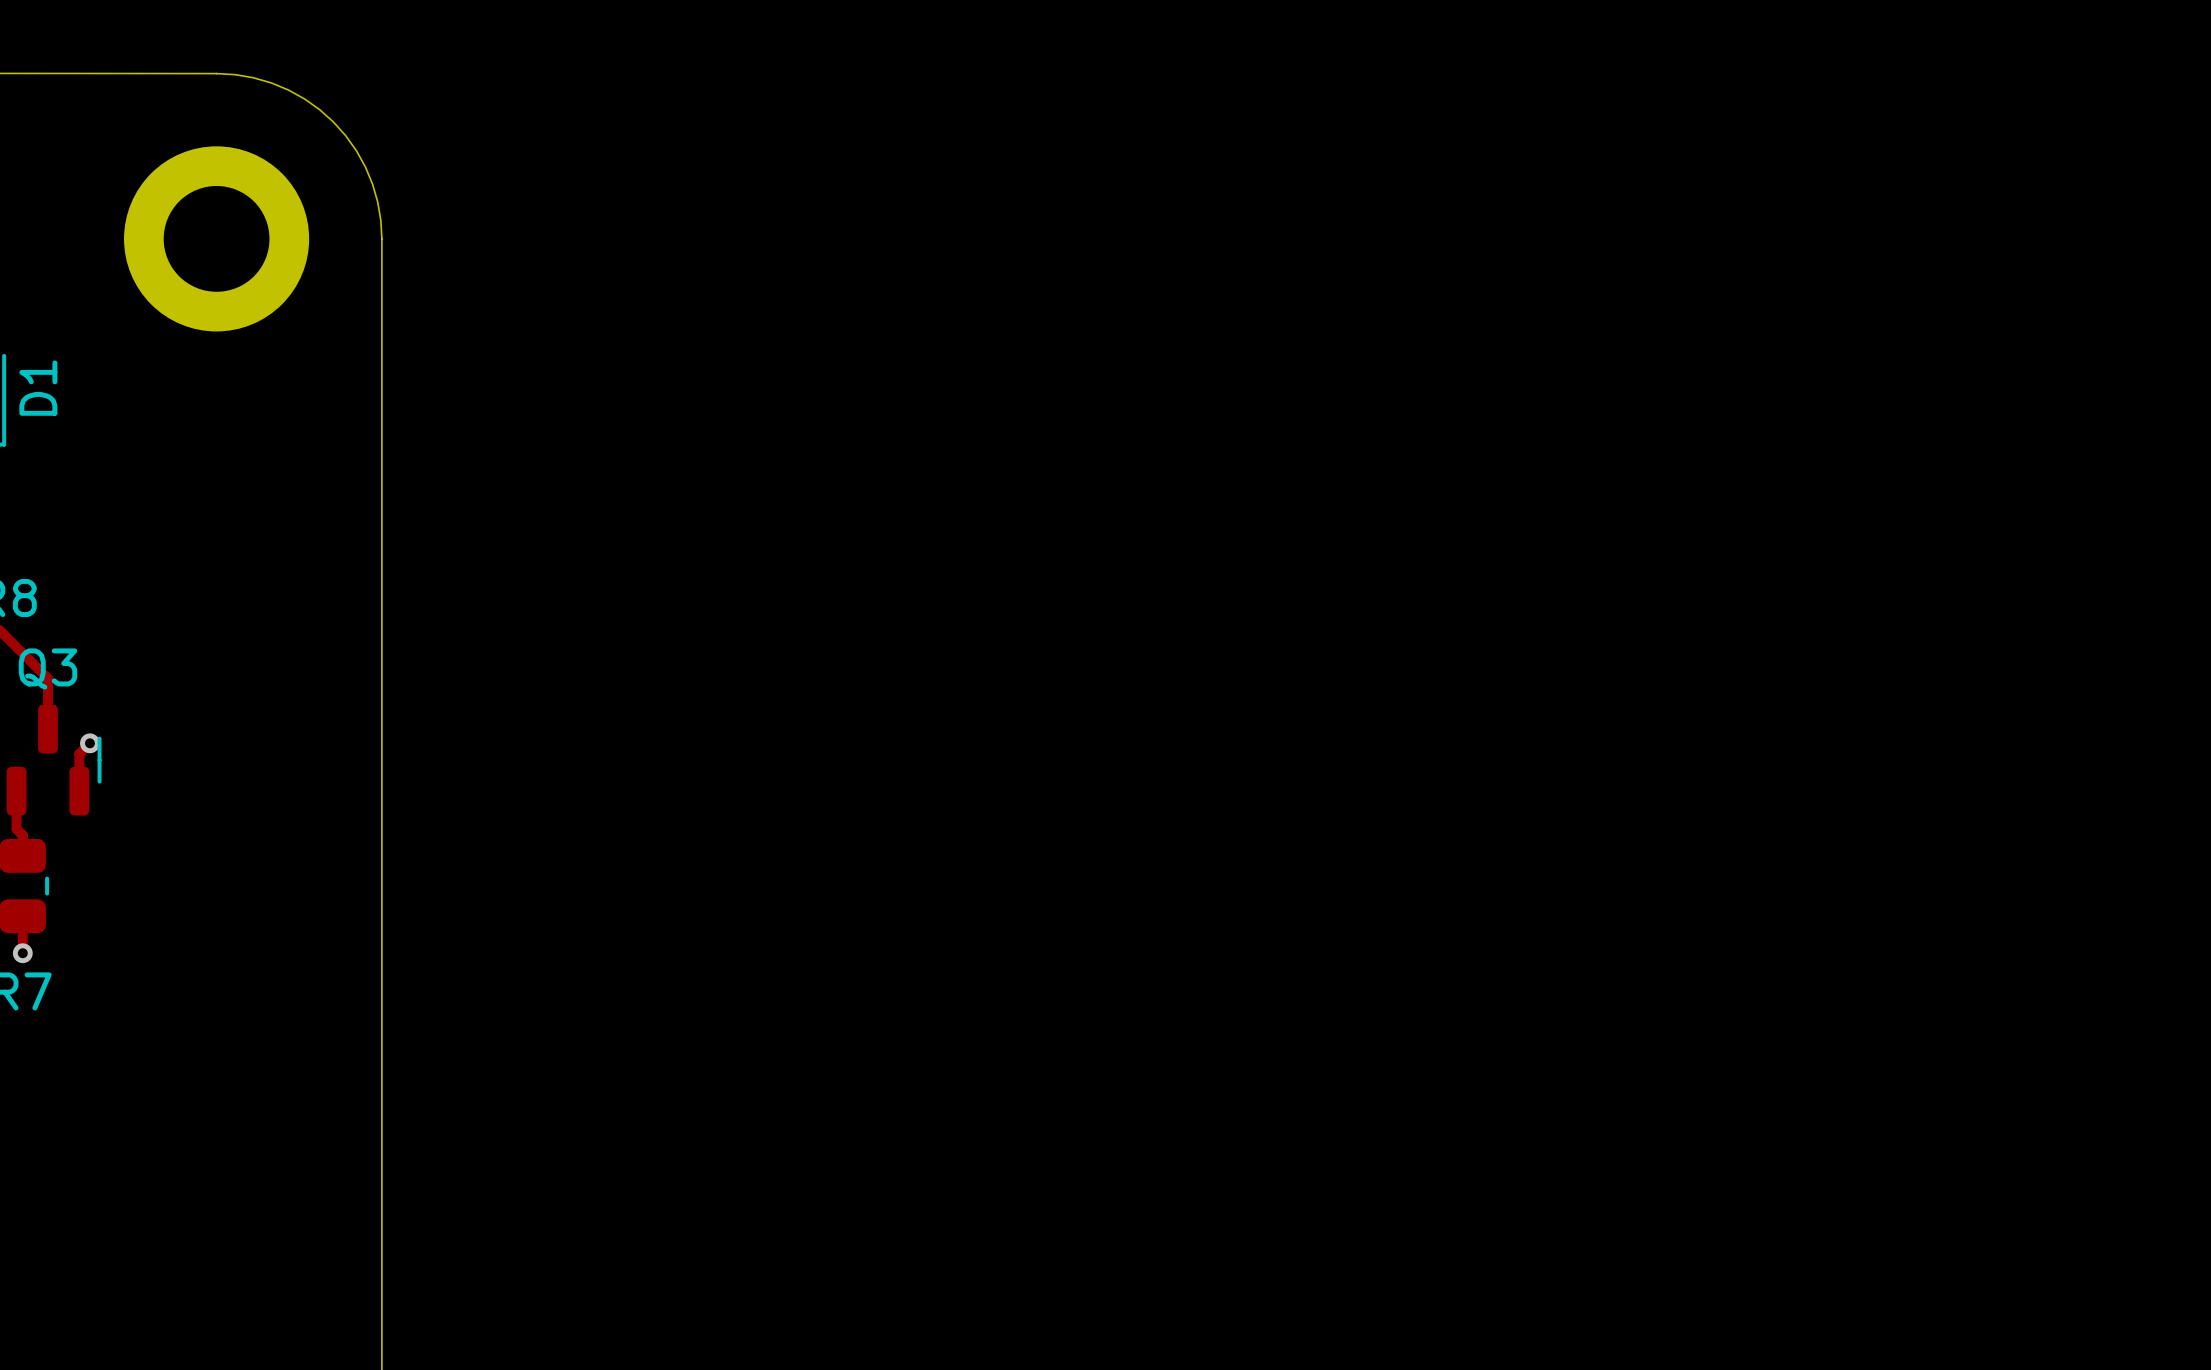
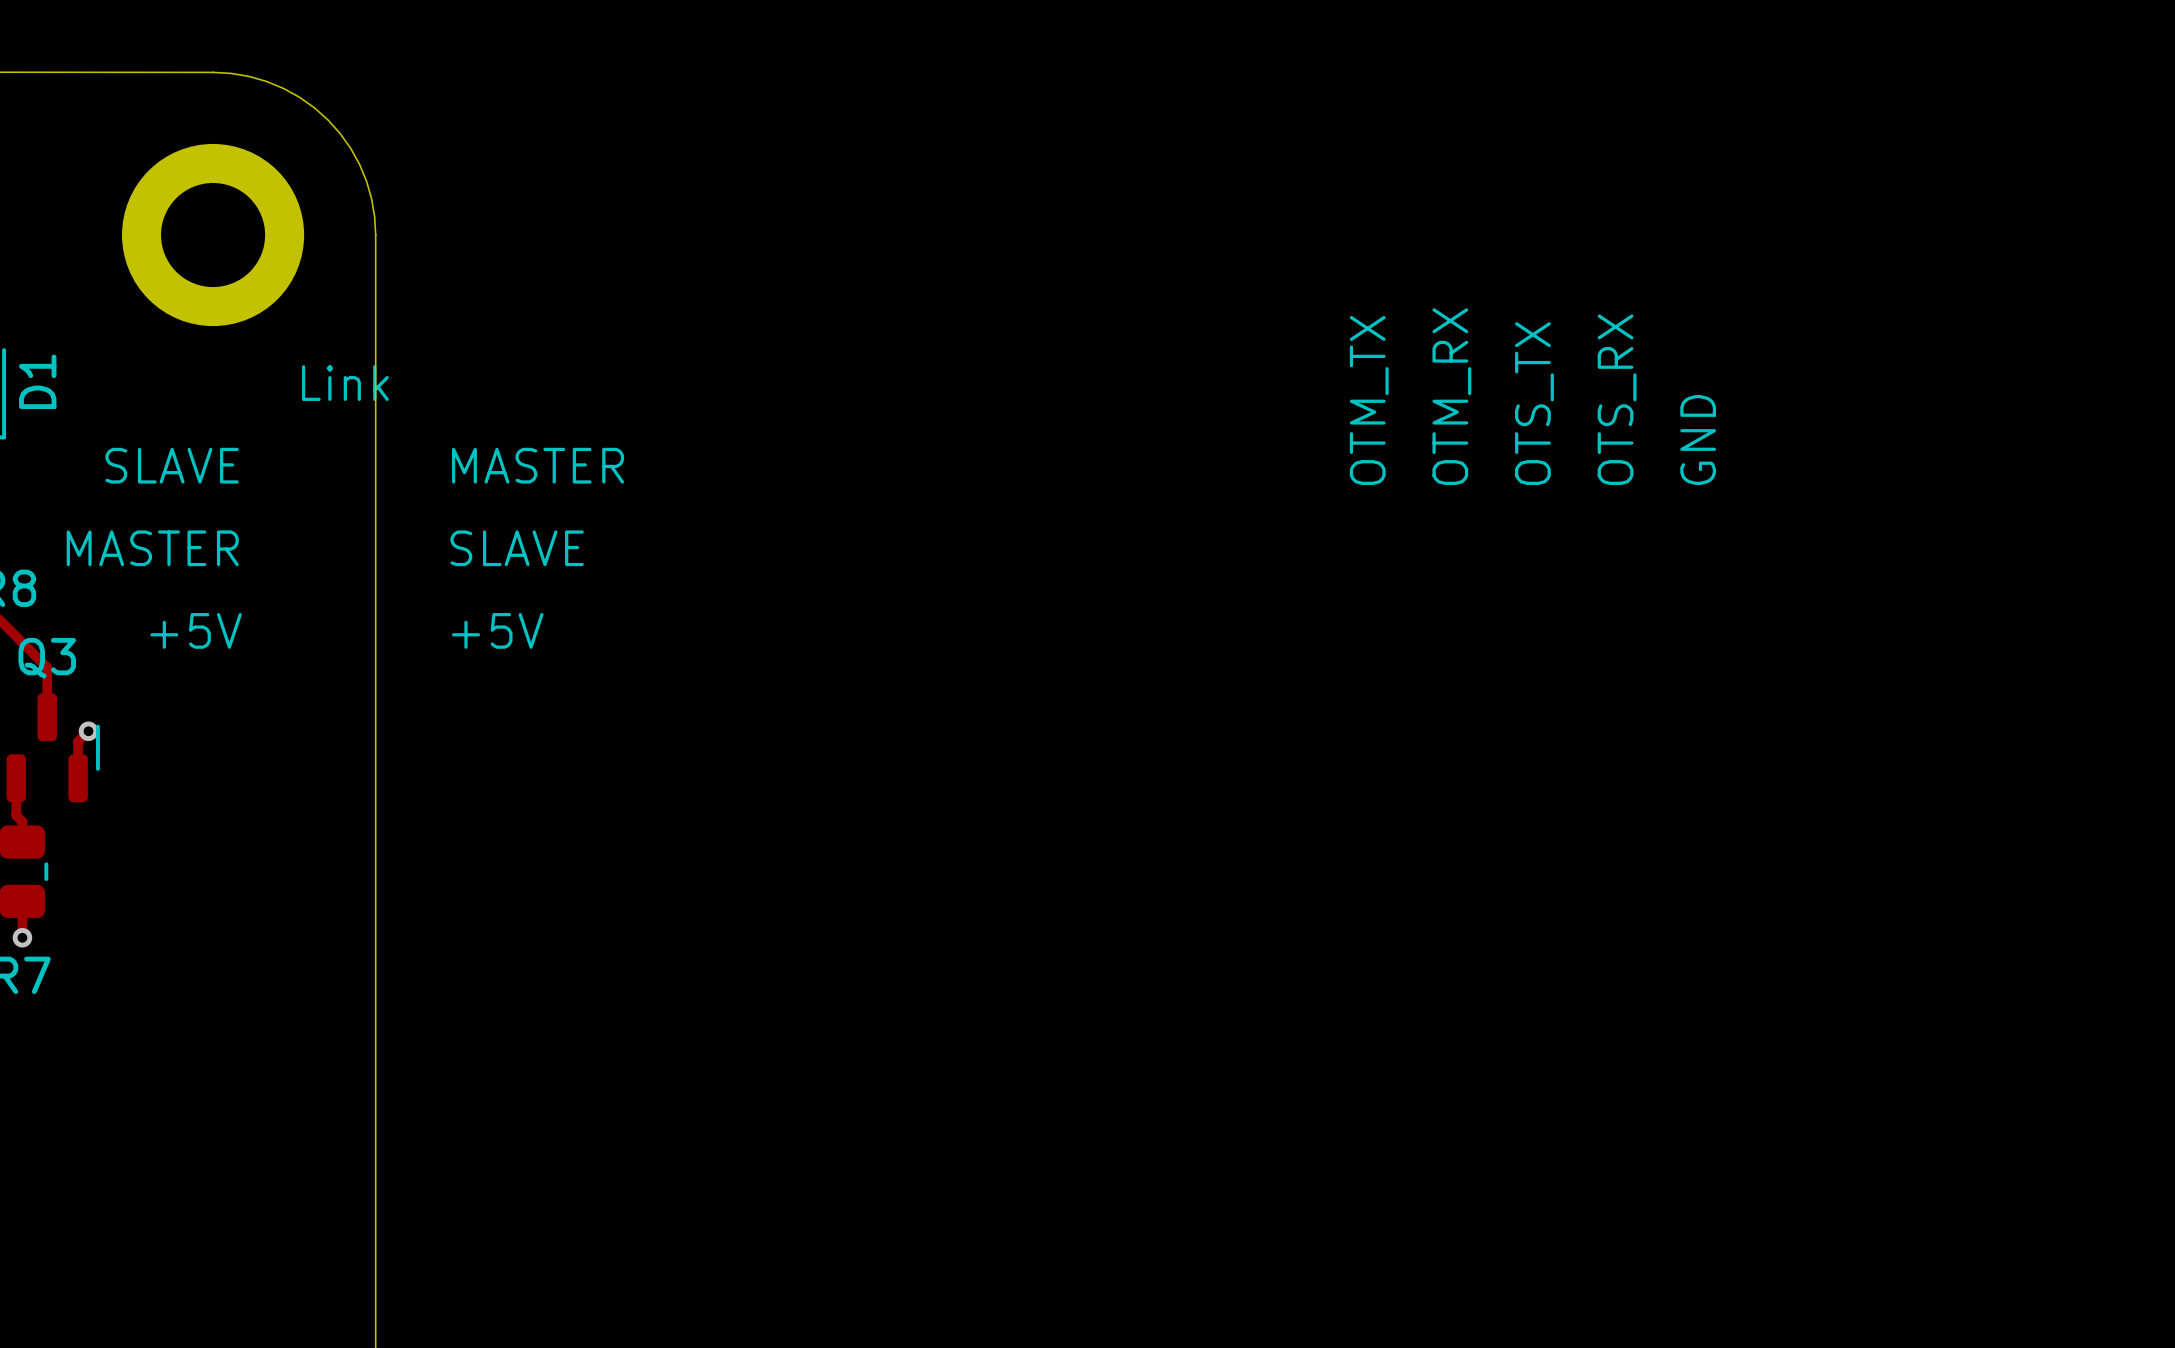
text: none -> Link (345, 383)
text: none -> OTM_RX (1451, 396)
text: none -> OTS_RX (1617, 399)
text: none -> OTM_TX (1369, 400)
text: none -> OTS_TX (1534, 403)
text: none -> GND (1698, 439)
text: none -> SLAVE (172, 465)
text: none -> MASTER (538, 465)
text: none -> MASTER (152, 548)
text: none -> SLAVE (517, 548)
text: none -> +5V (196, 630)
text: none -> +5V (497, 630)

